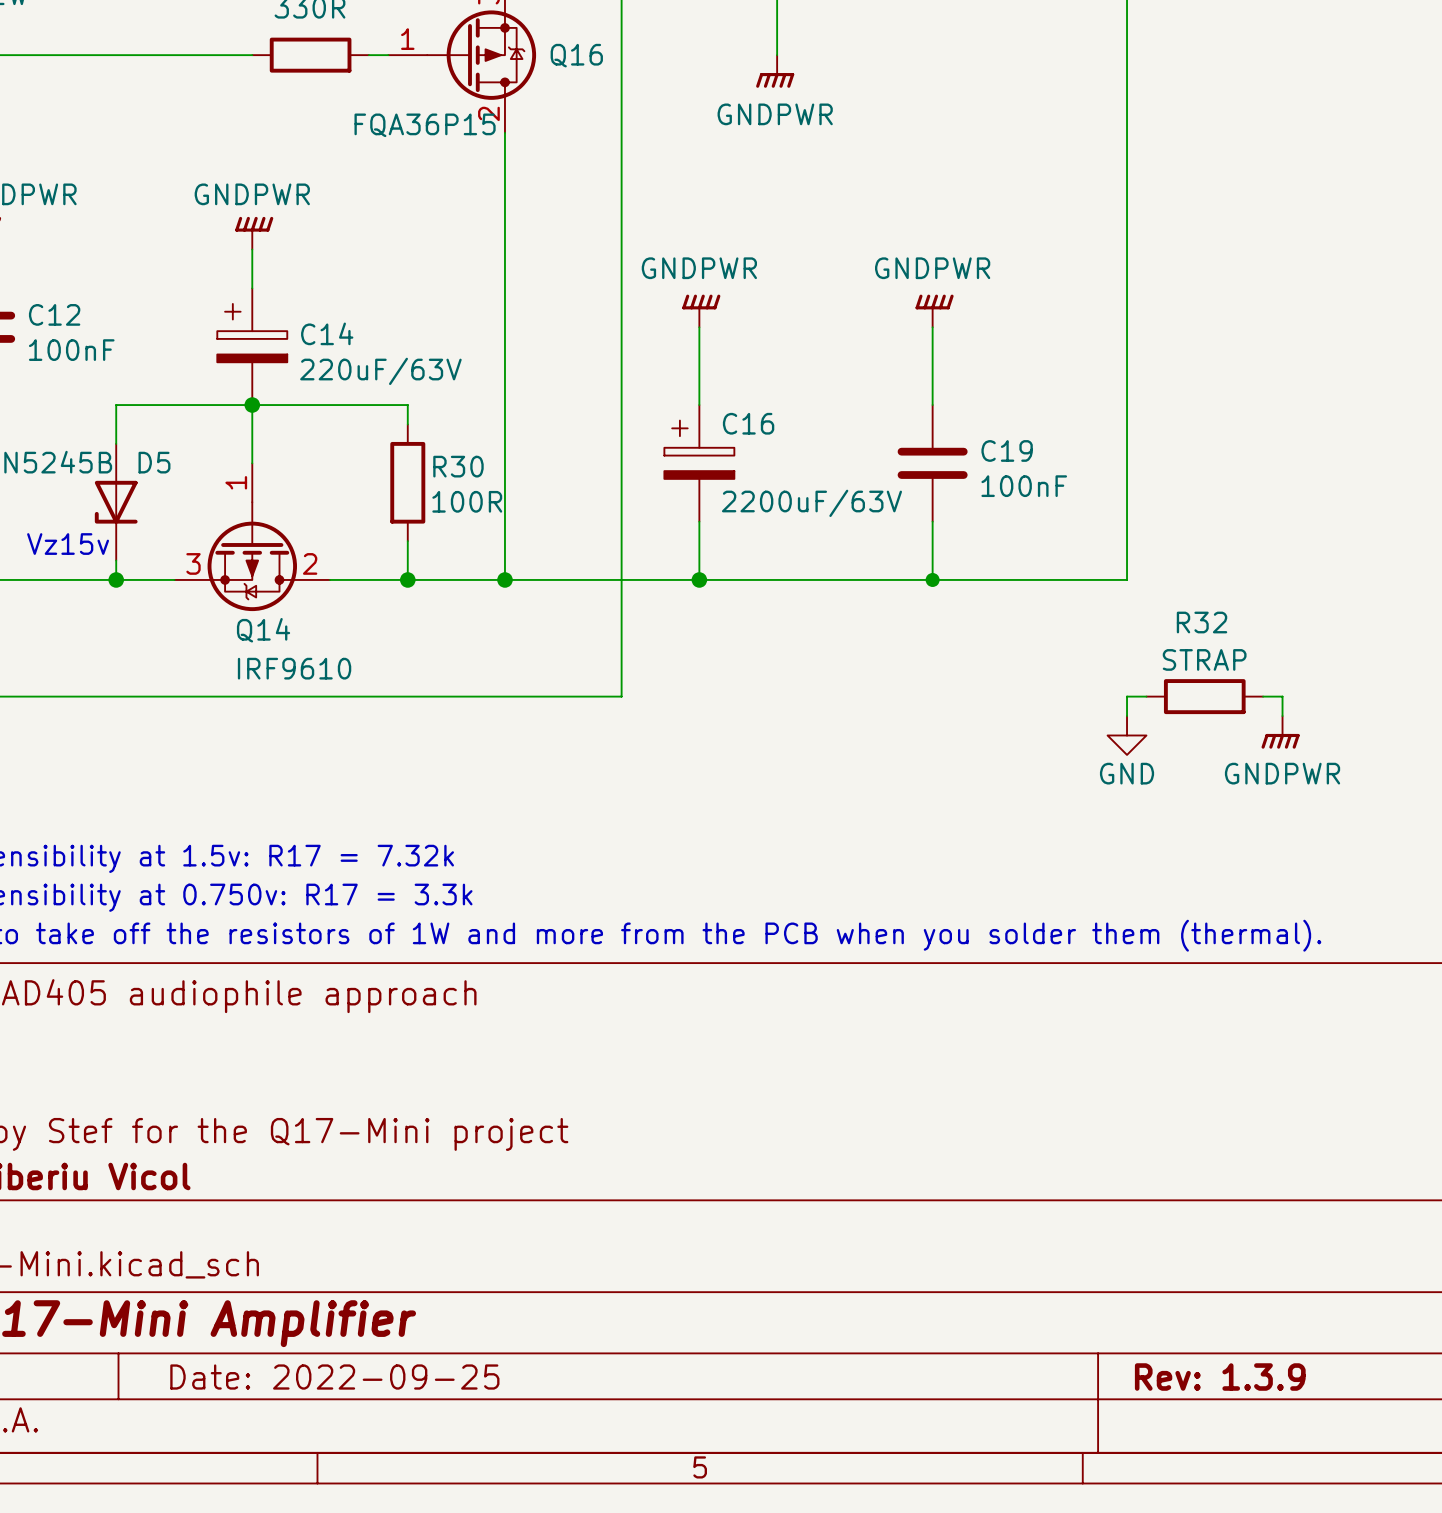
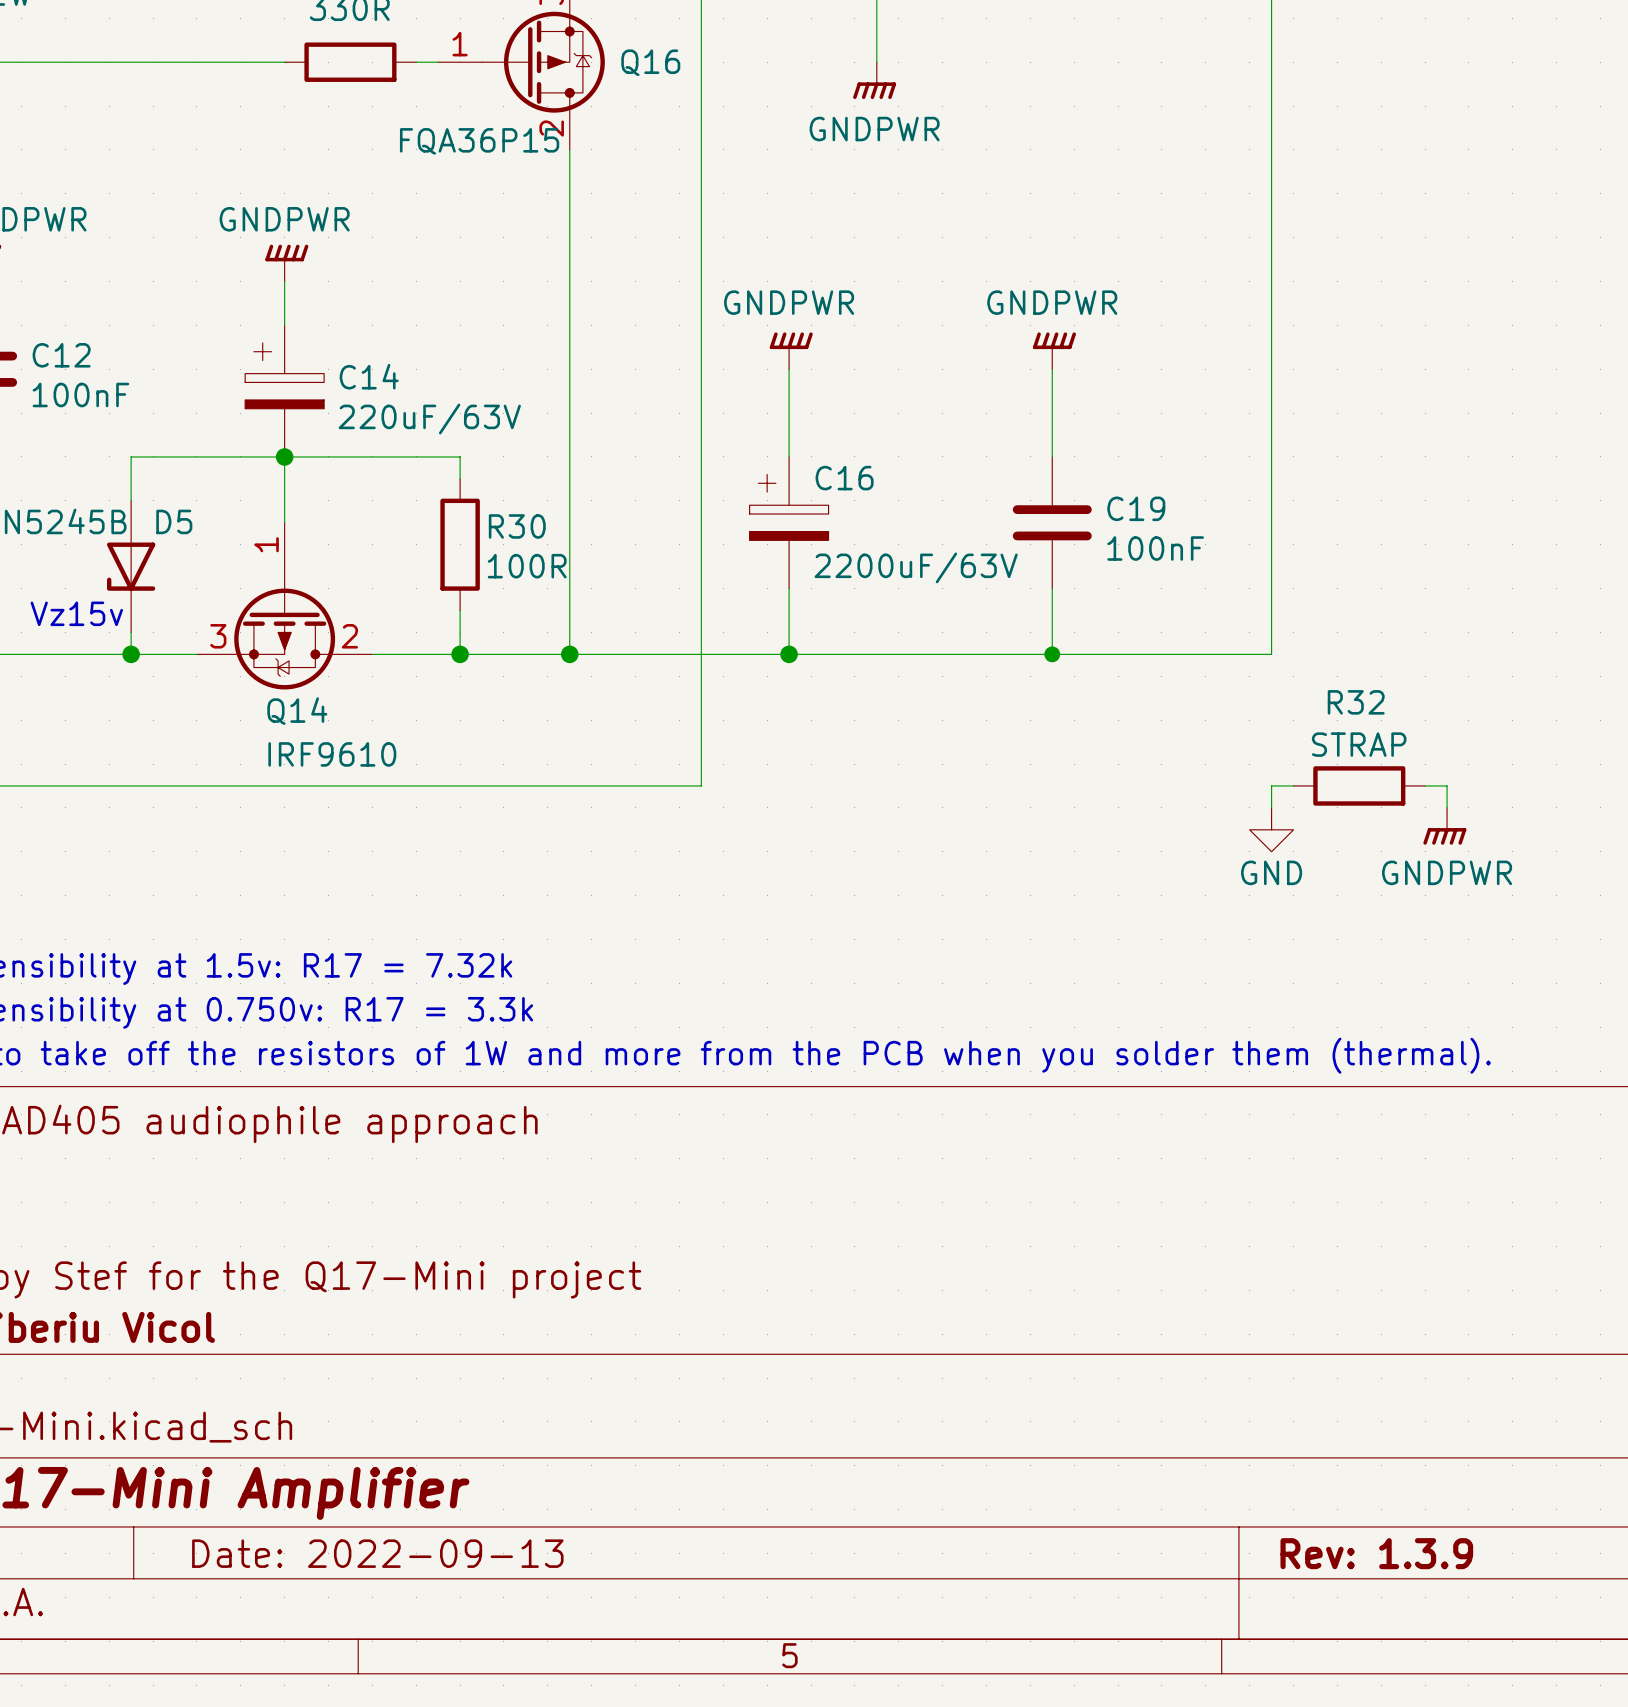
title block: Date: 2022-09-25 (334, 1377) -> Date: 2022-09-13 (377, 1553)

